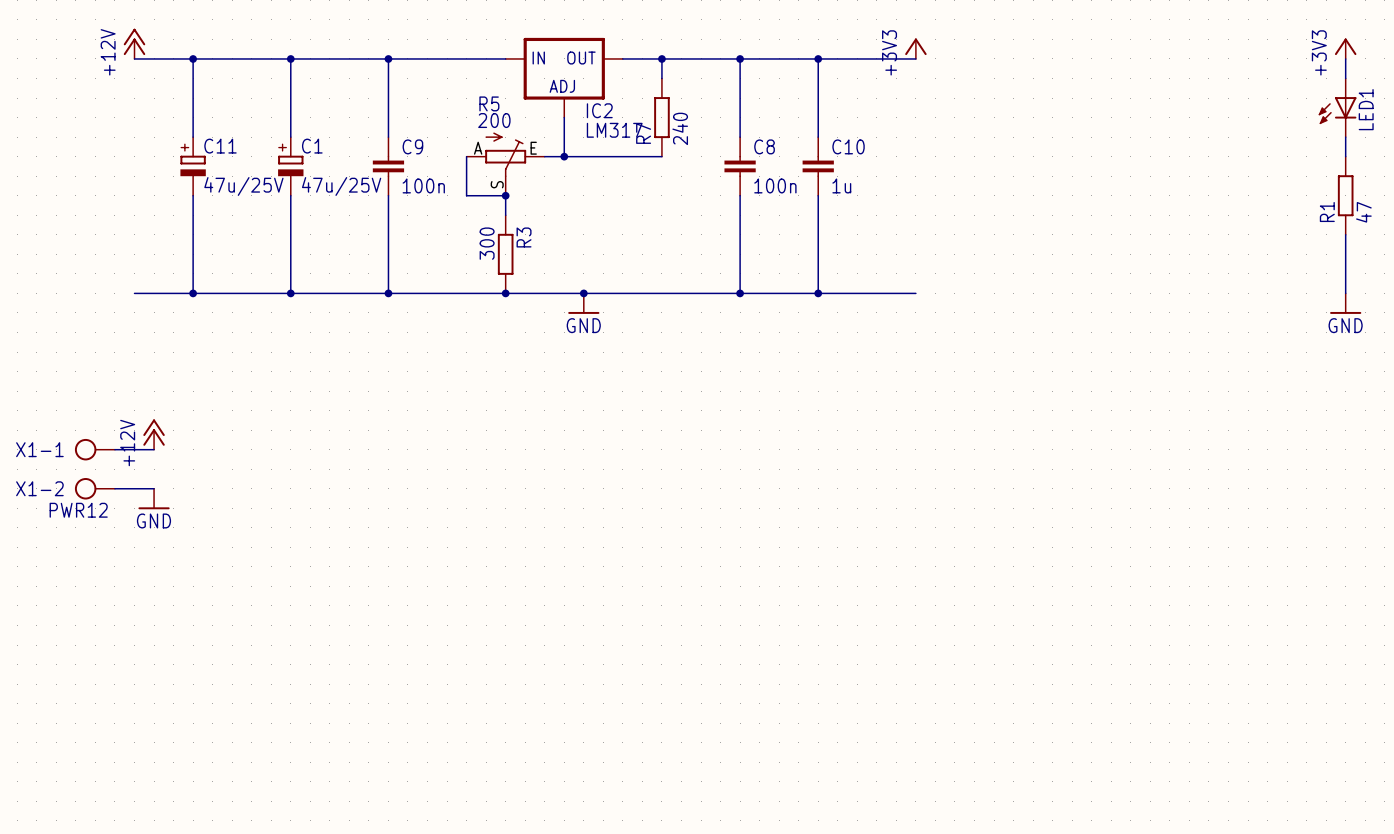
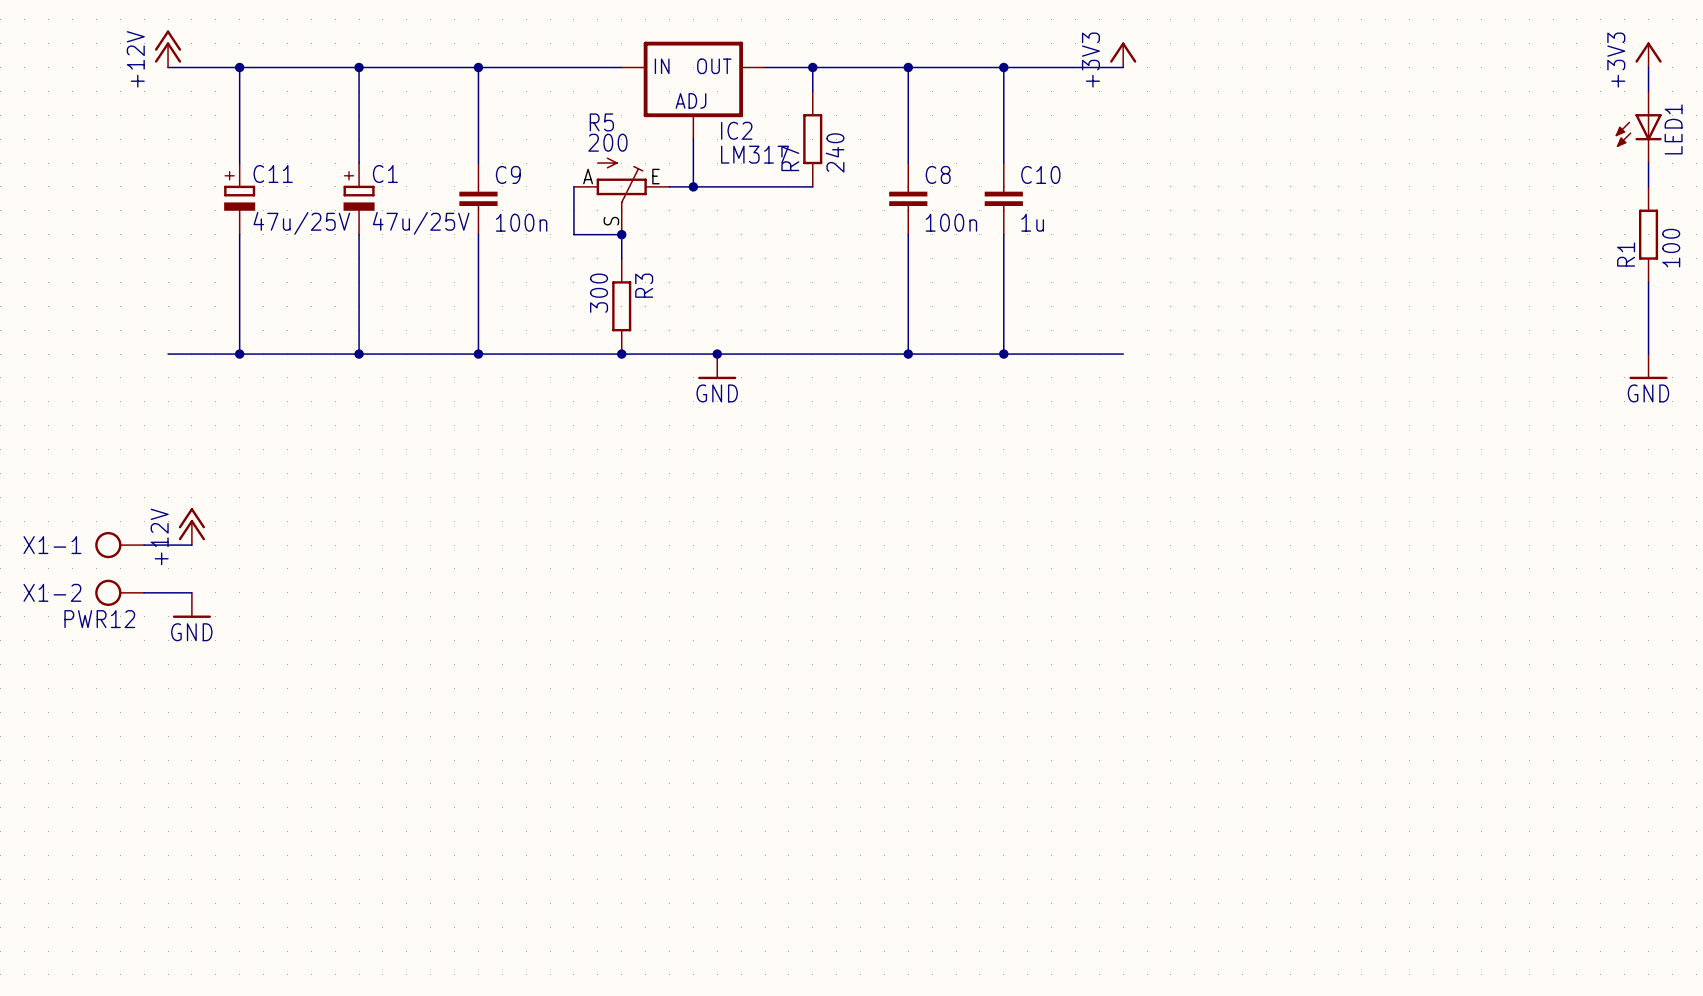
R1 value: 47 (1363, 212) -> 100 (1671, 248)

